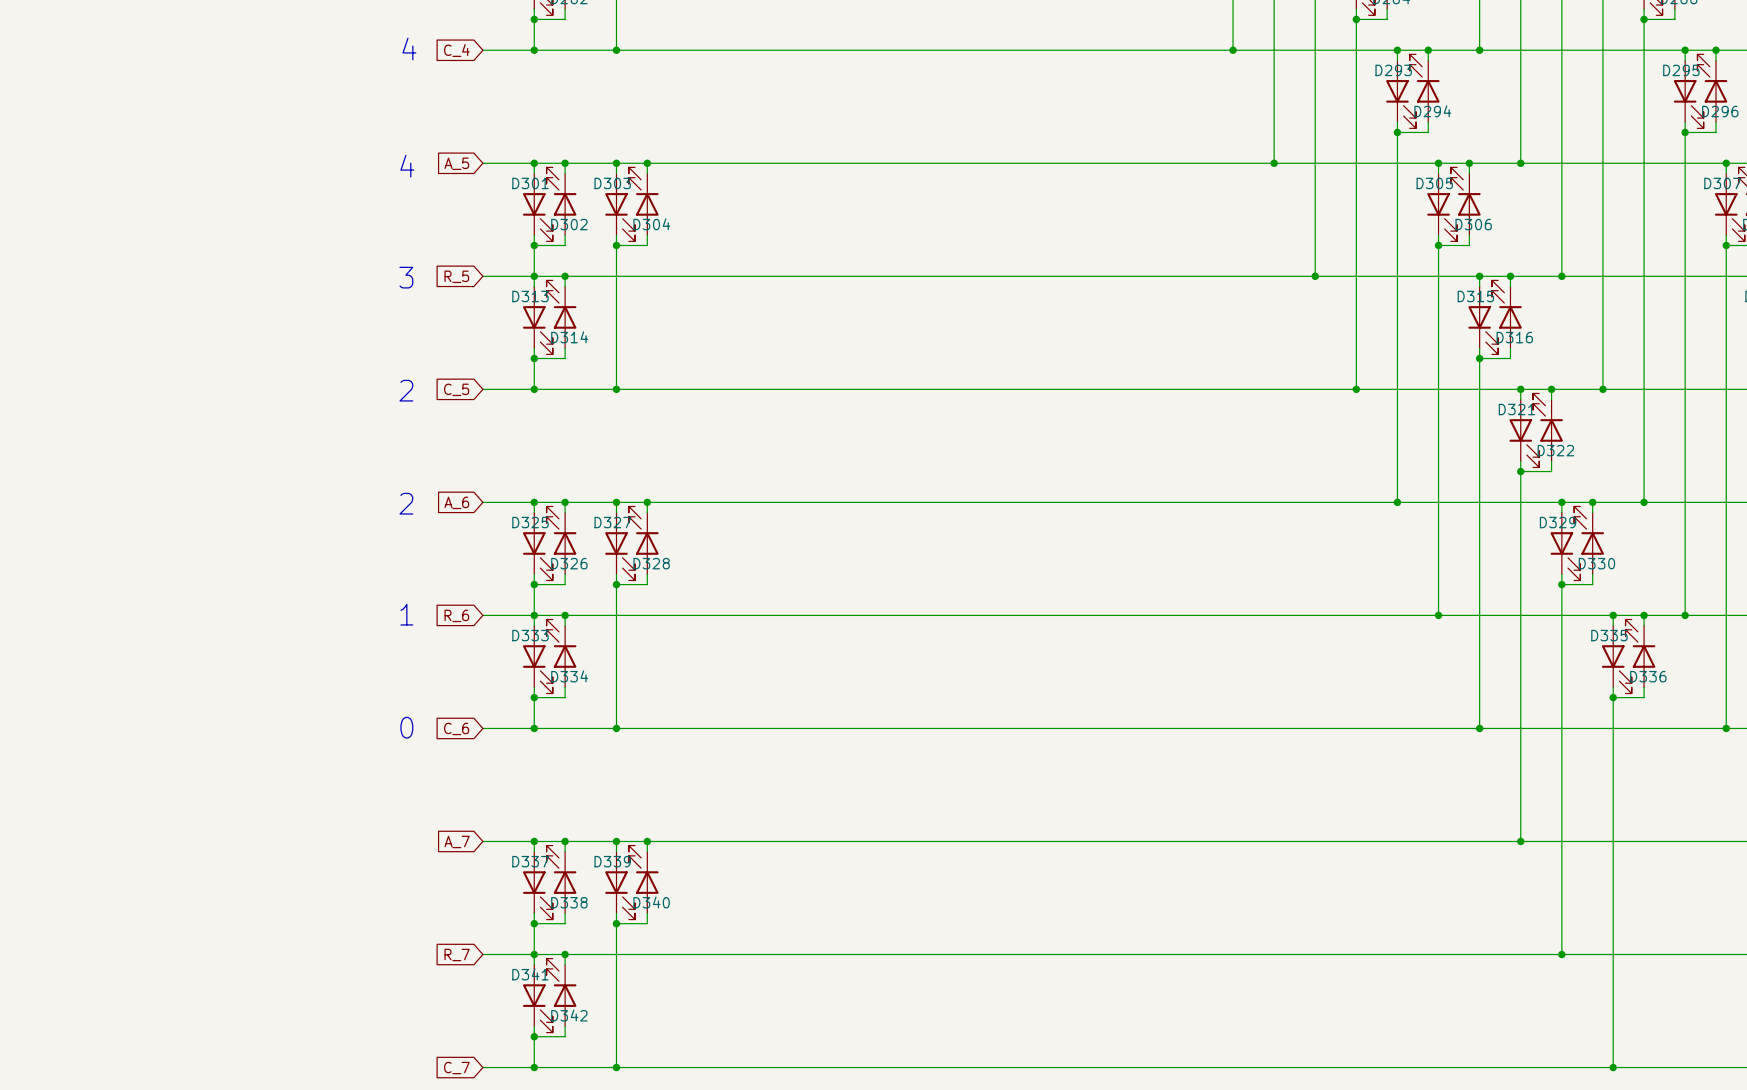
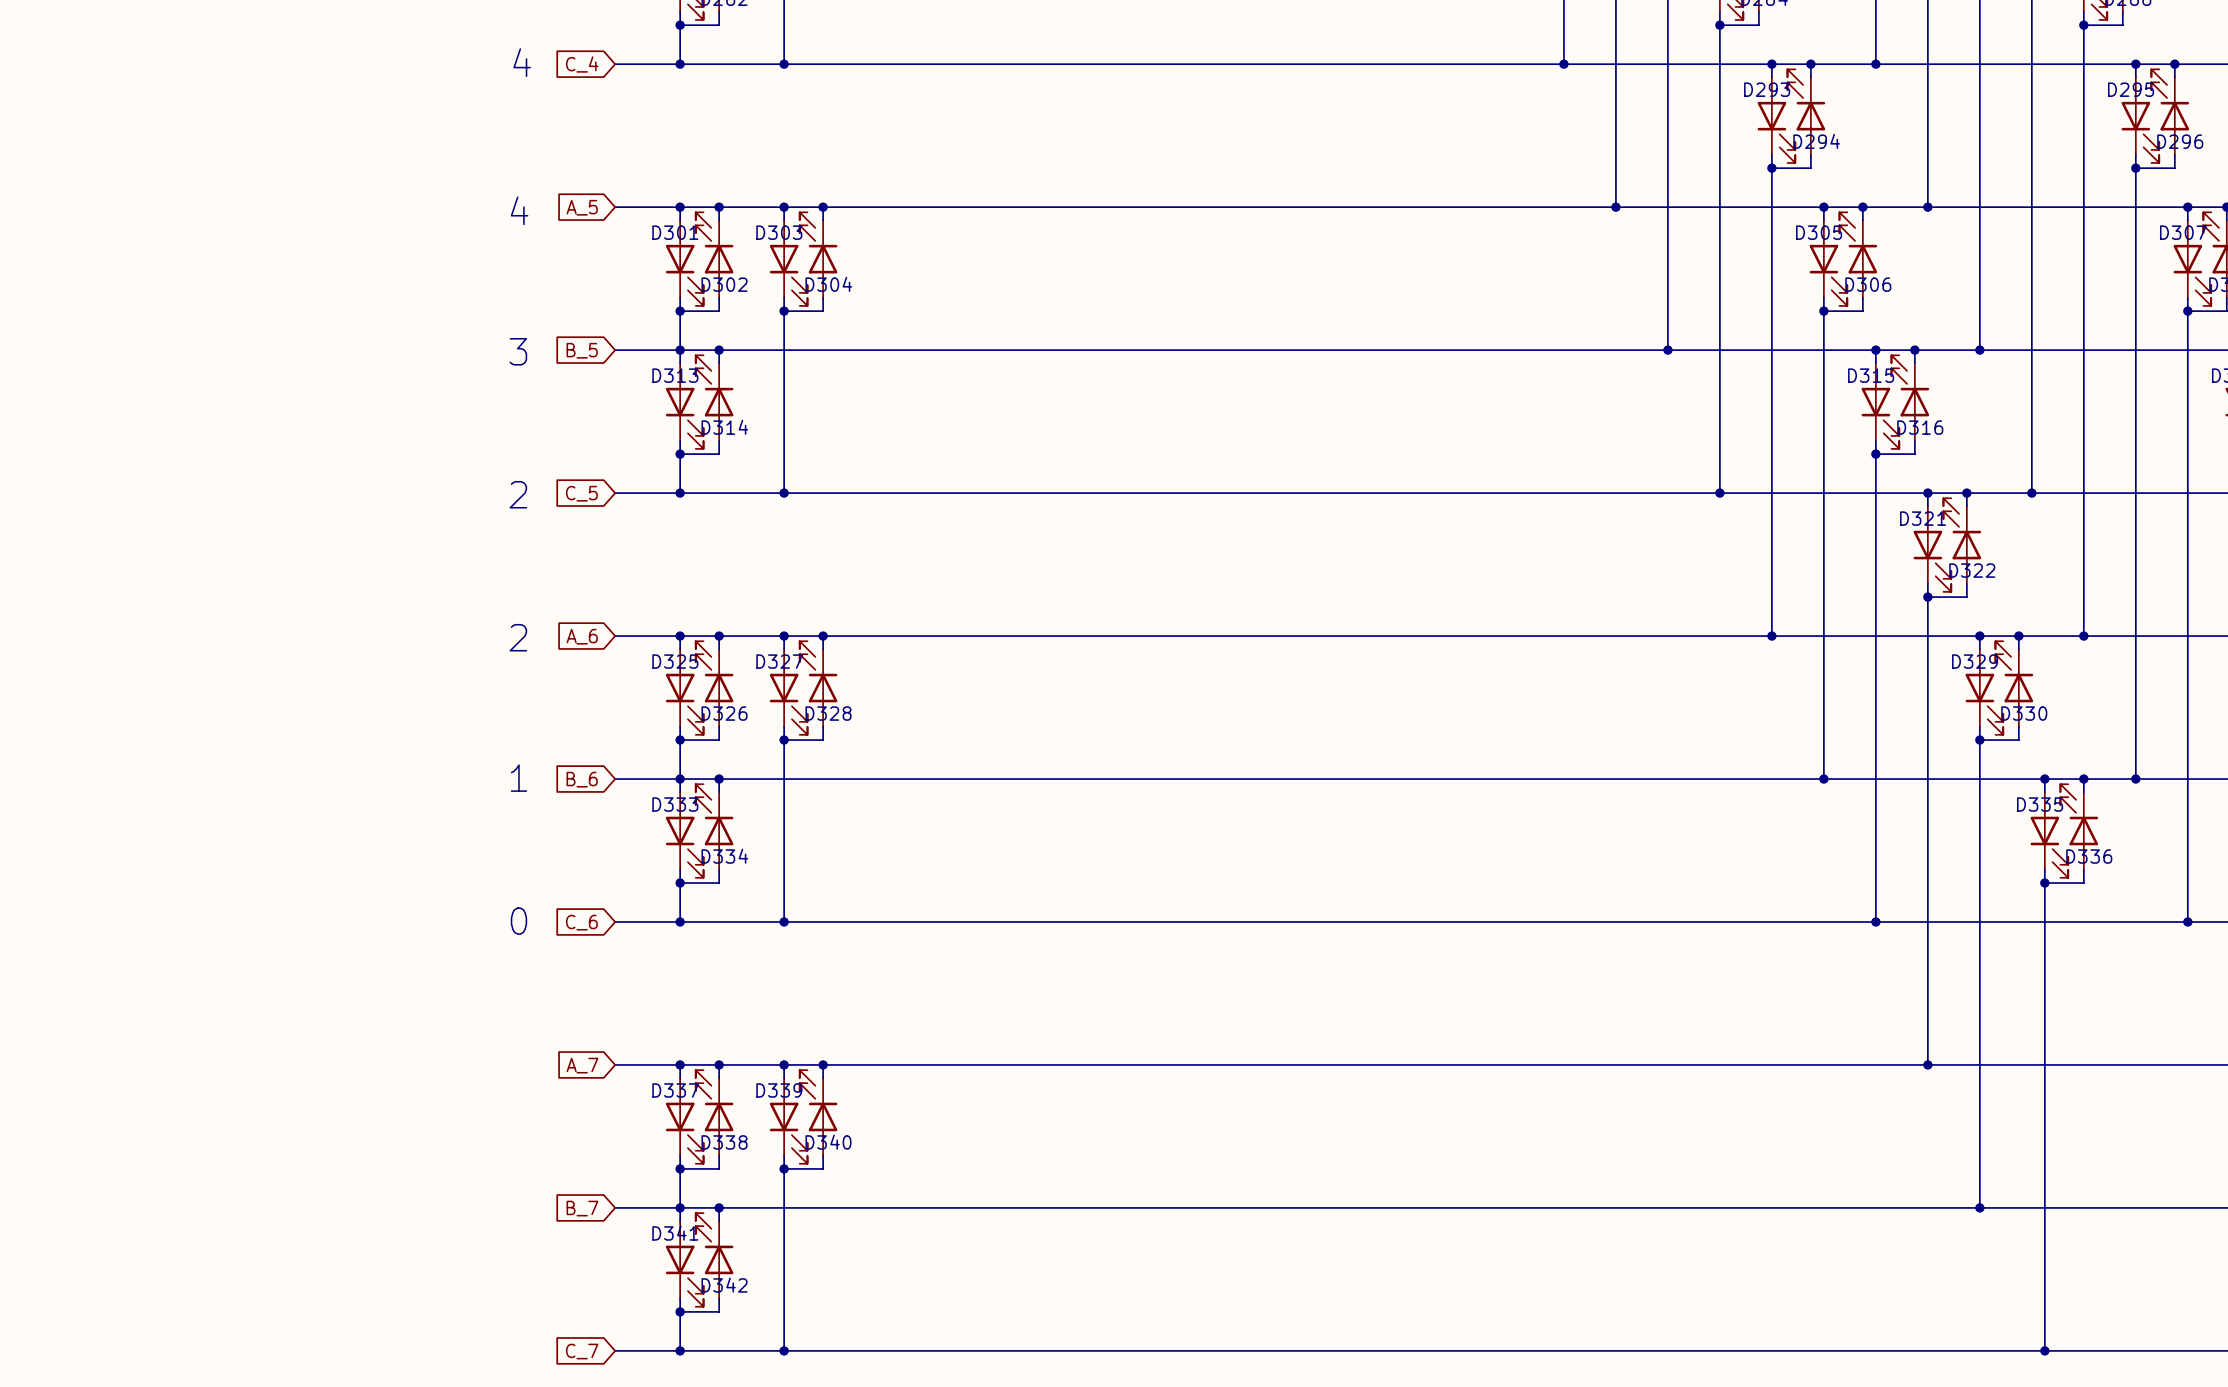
global label: R_5 (456, 276) -> B_5 (582, 350)
global label: R_6 (456, 615) -> B_6 (582, 779)
global label: R_7 (457, 955) -> B_7 (582, 1208)

